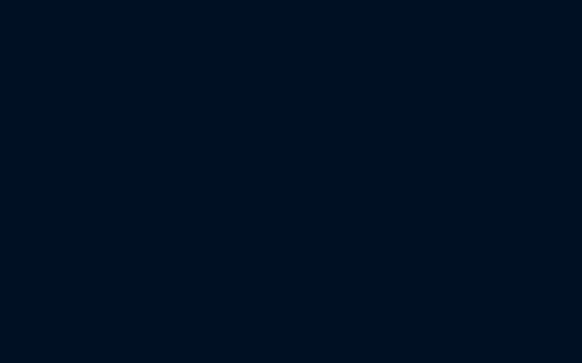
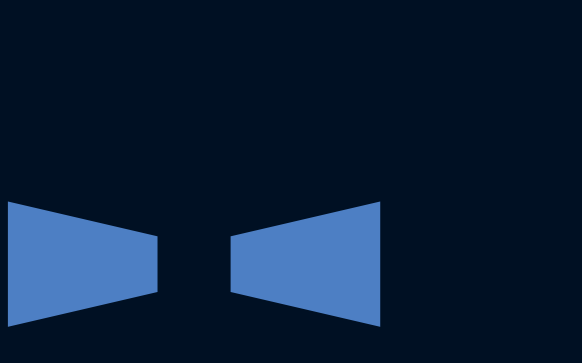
part: none -> (194, 264)

